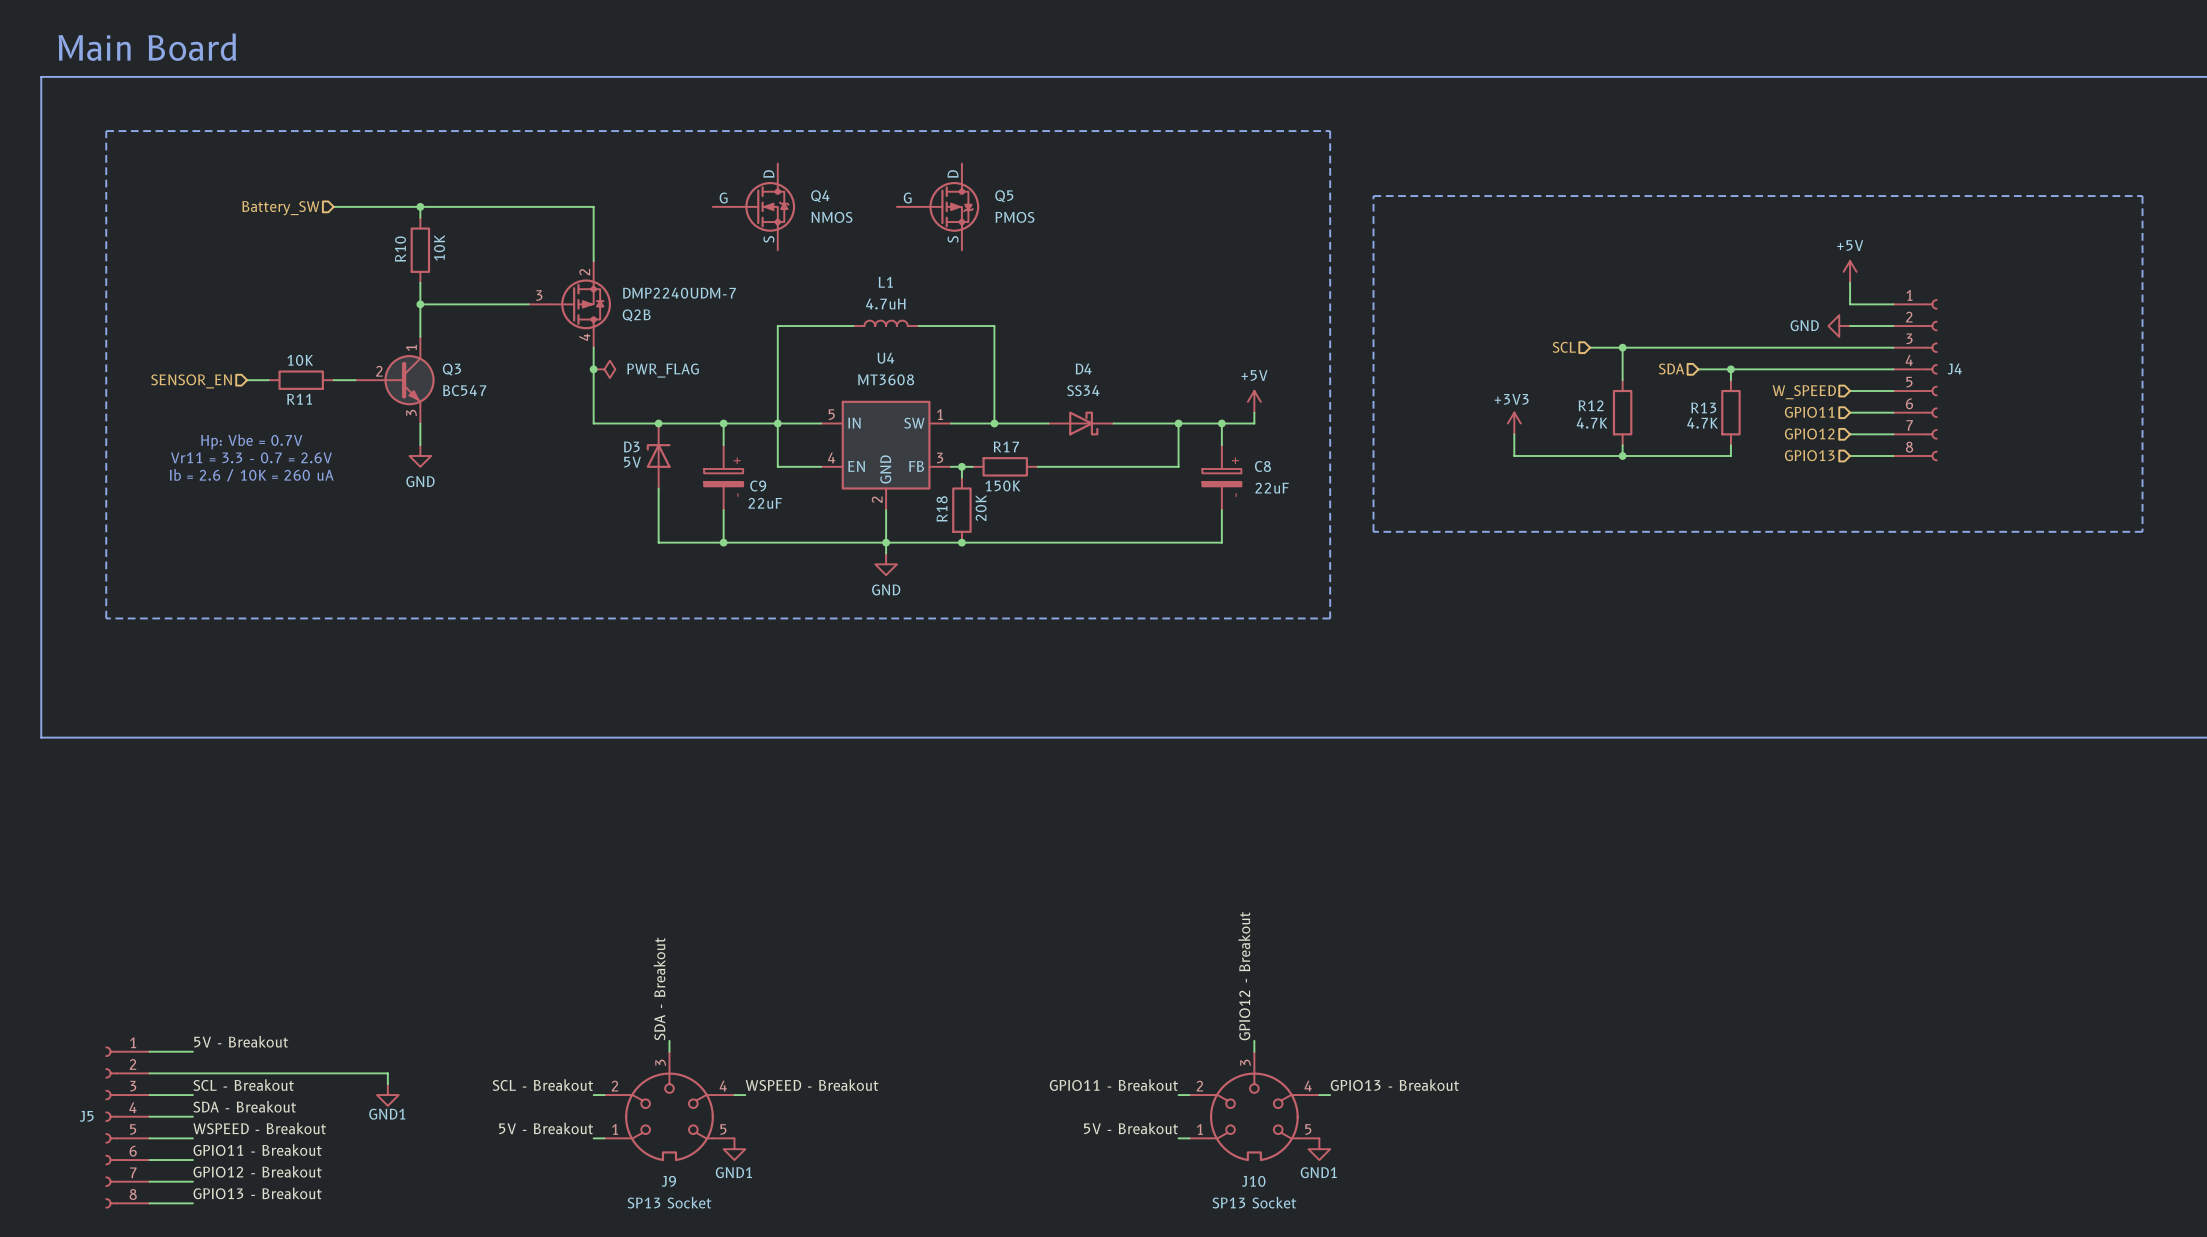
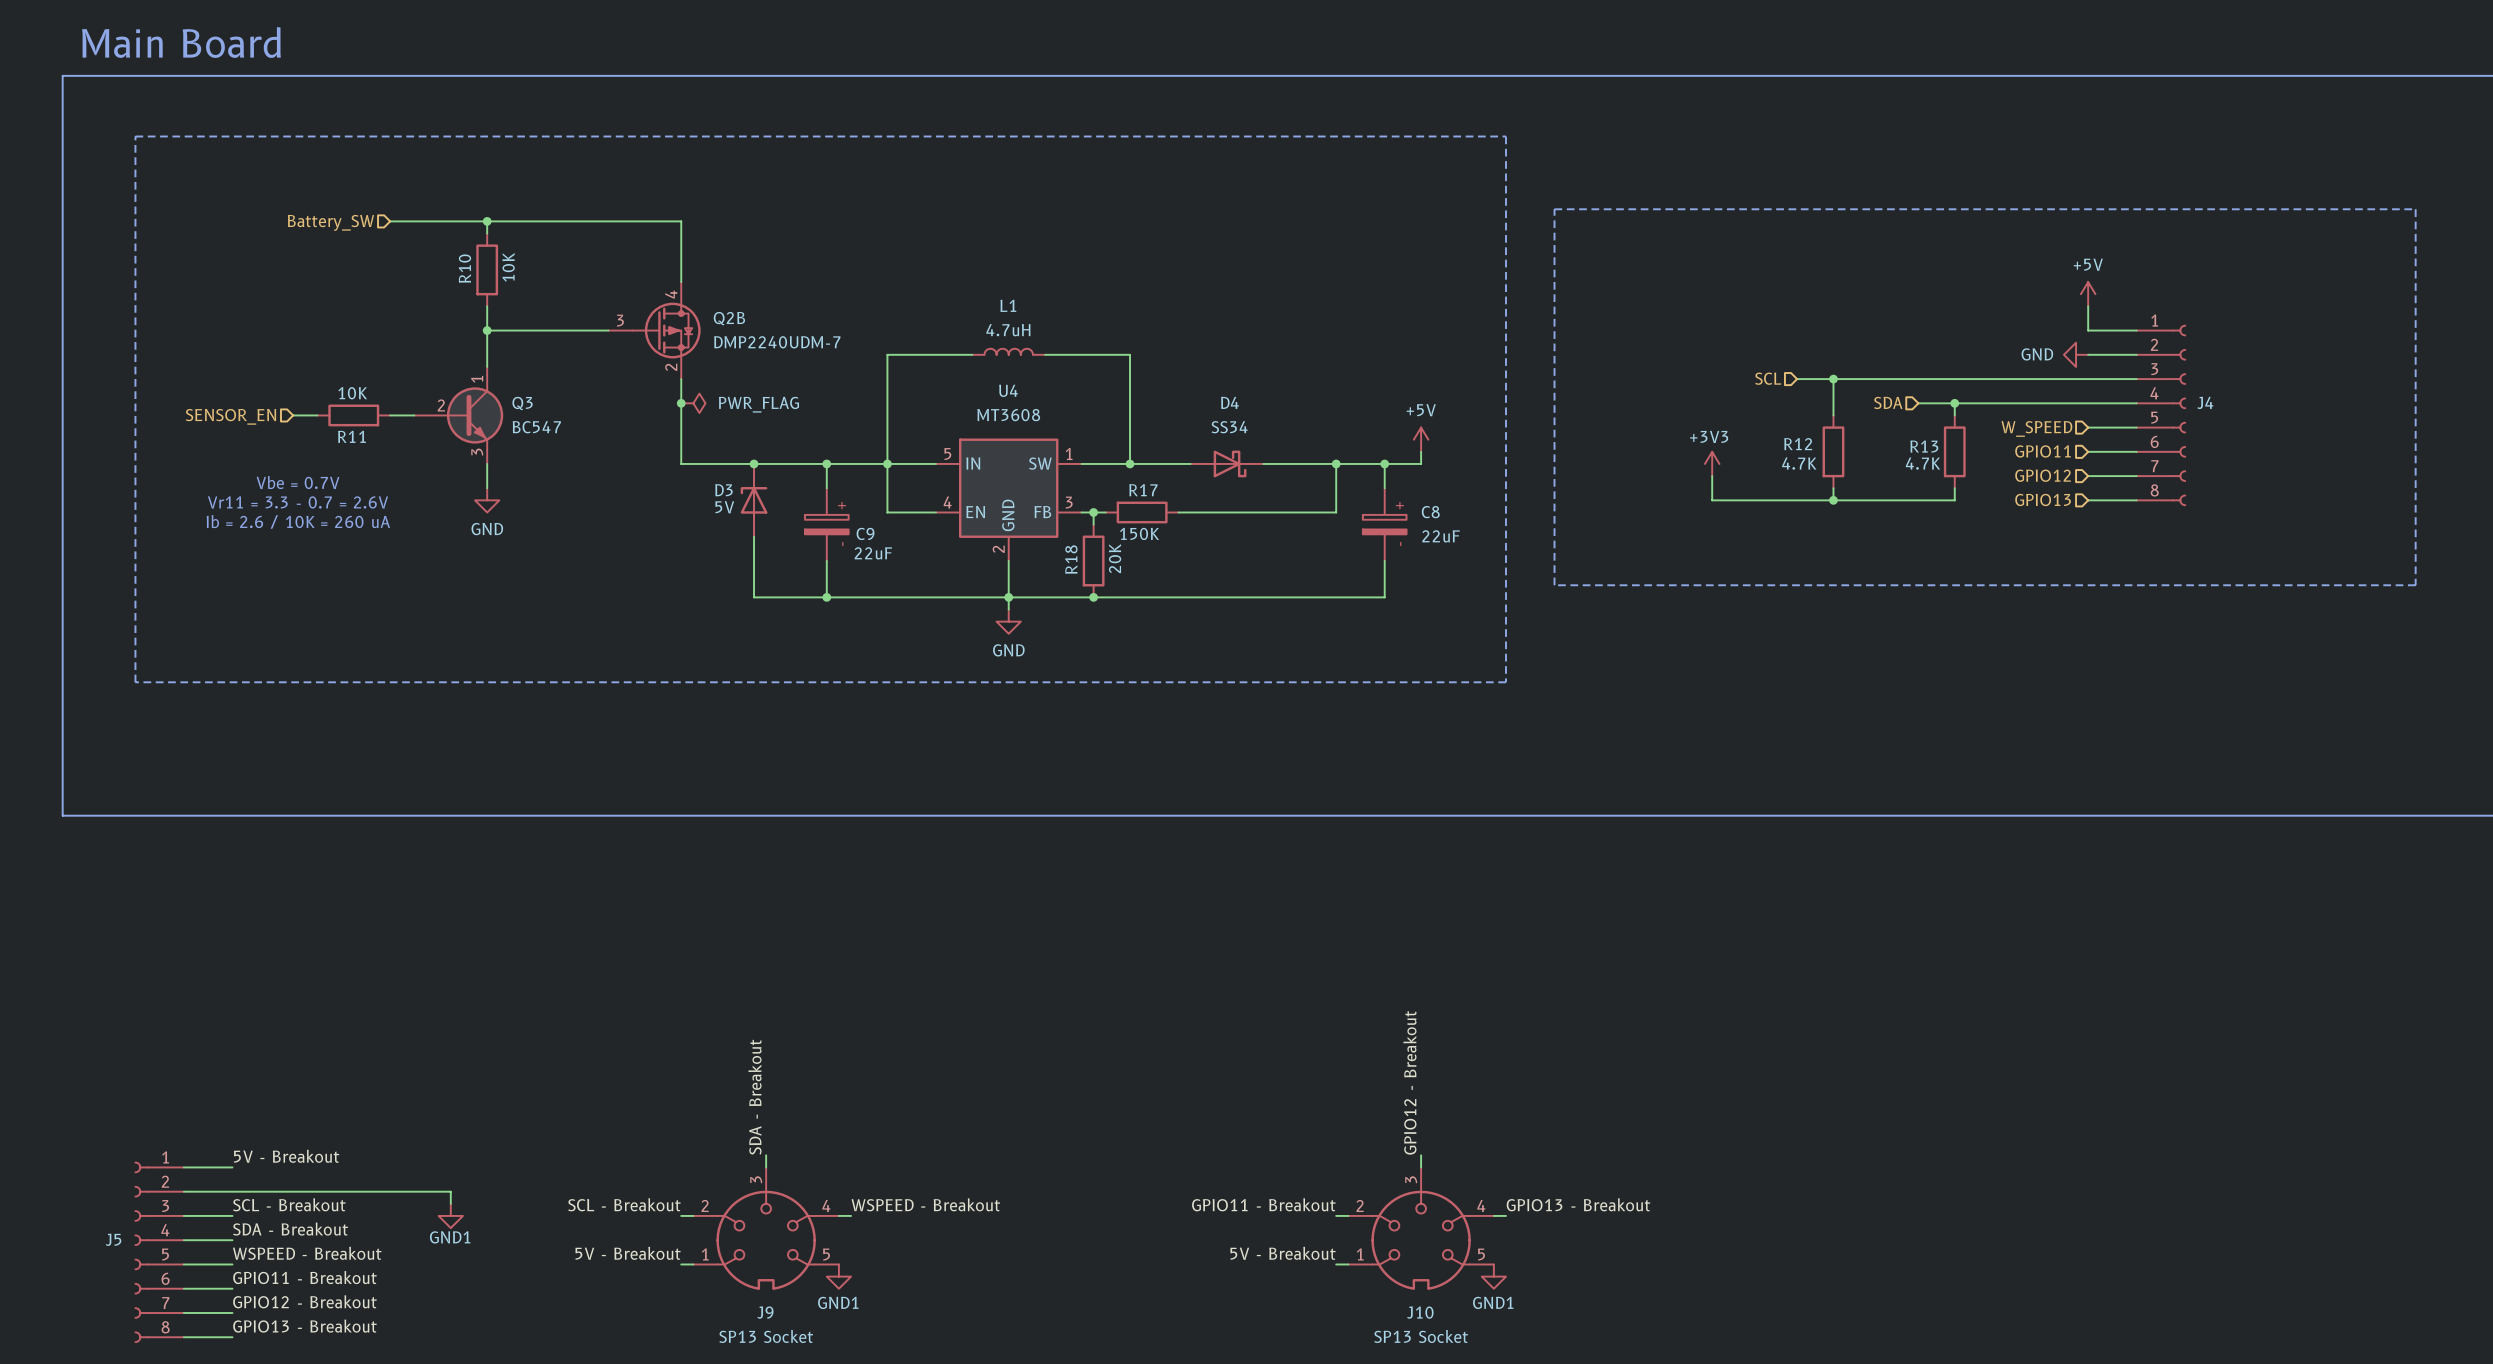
Q4: NMOS (753, 206) -> none
Q5: PMOS (938, 206) -> none
Q2B flip: as is (580, 304) -> up-down (666, 330)
text: Hp: Vbe = 0.7V (251, 441) -> Vbe = 0.7V (298, 482)

